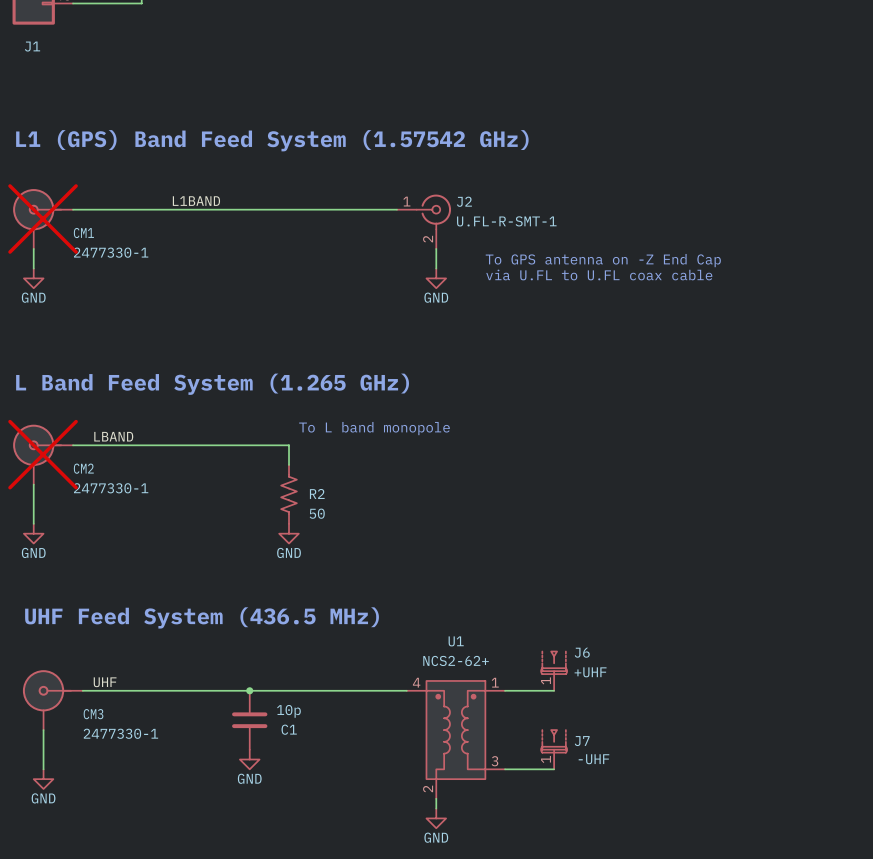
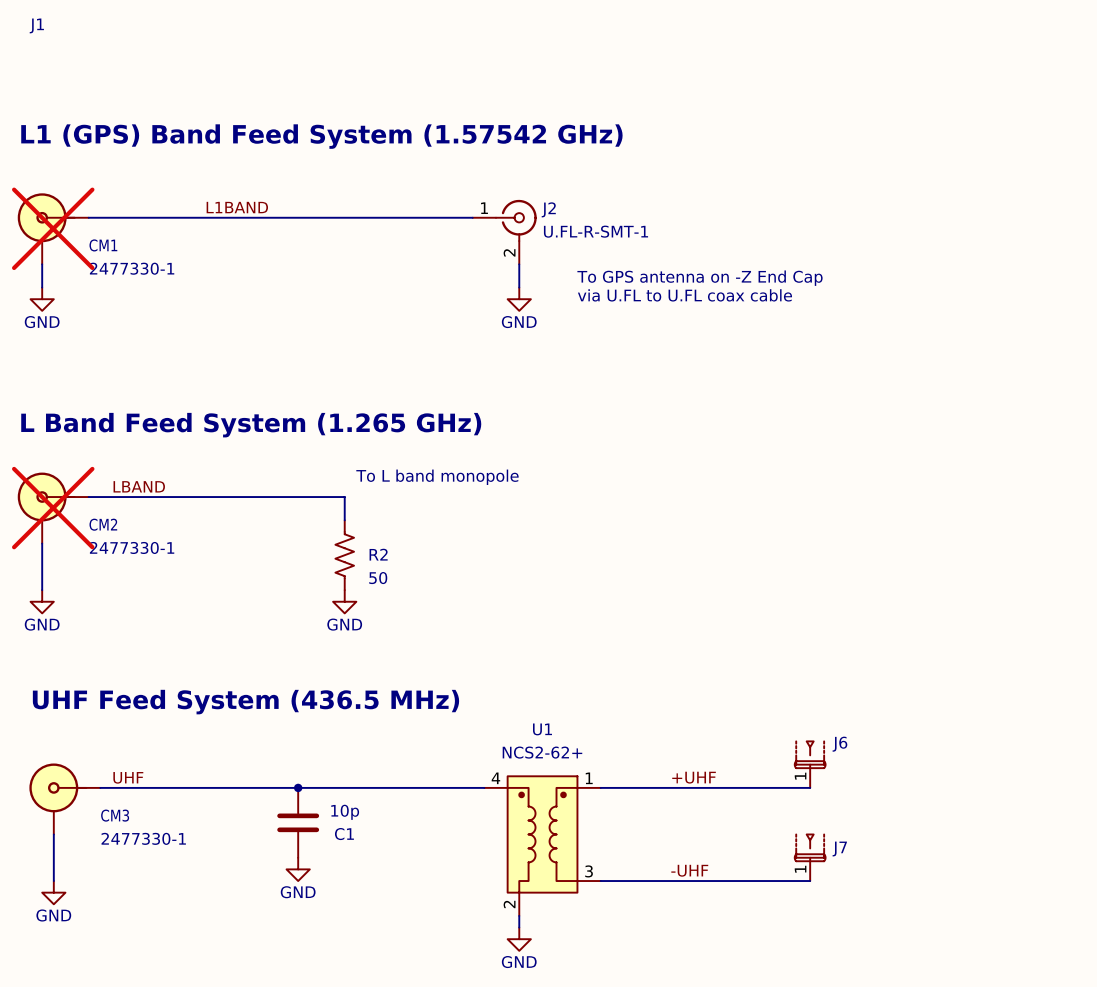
J6 position: (554, 671) -> (810, 764)
J6 value: +UHF (590, 672) -> none
label: none -> +UHF (694, 777)
wire: none -> (658, 787) (810, 787)
J7 position: (554, 749) -> (810, 857)
J7 value: -UHF (593, 759) -> none
label: none -> -UHF (689, 870)
wire: none -> (658, 881) (810, 881)

